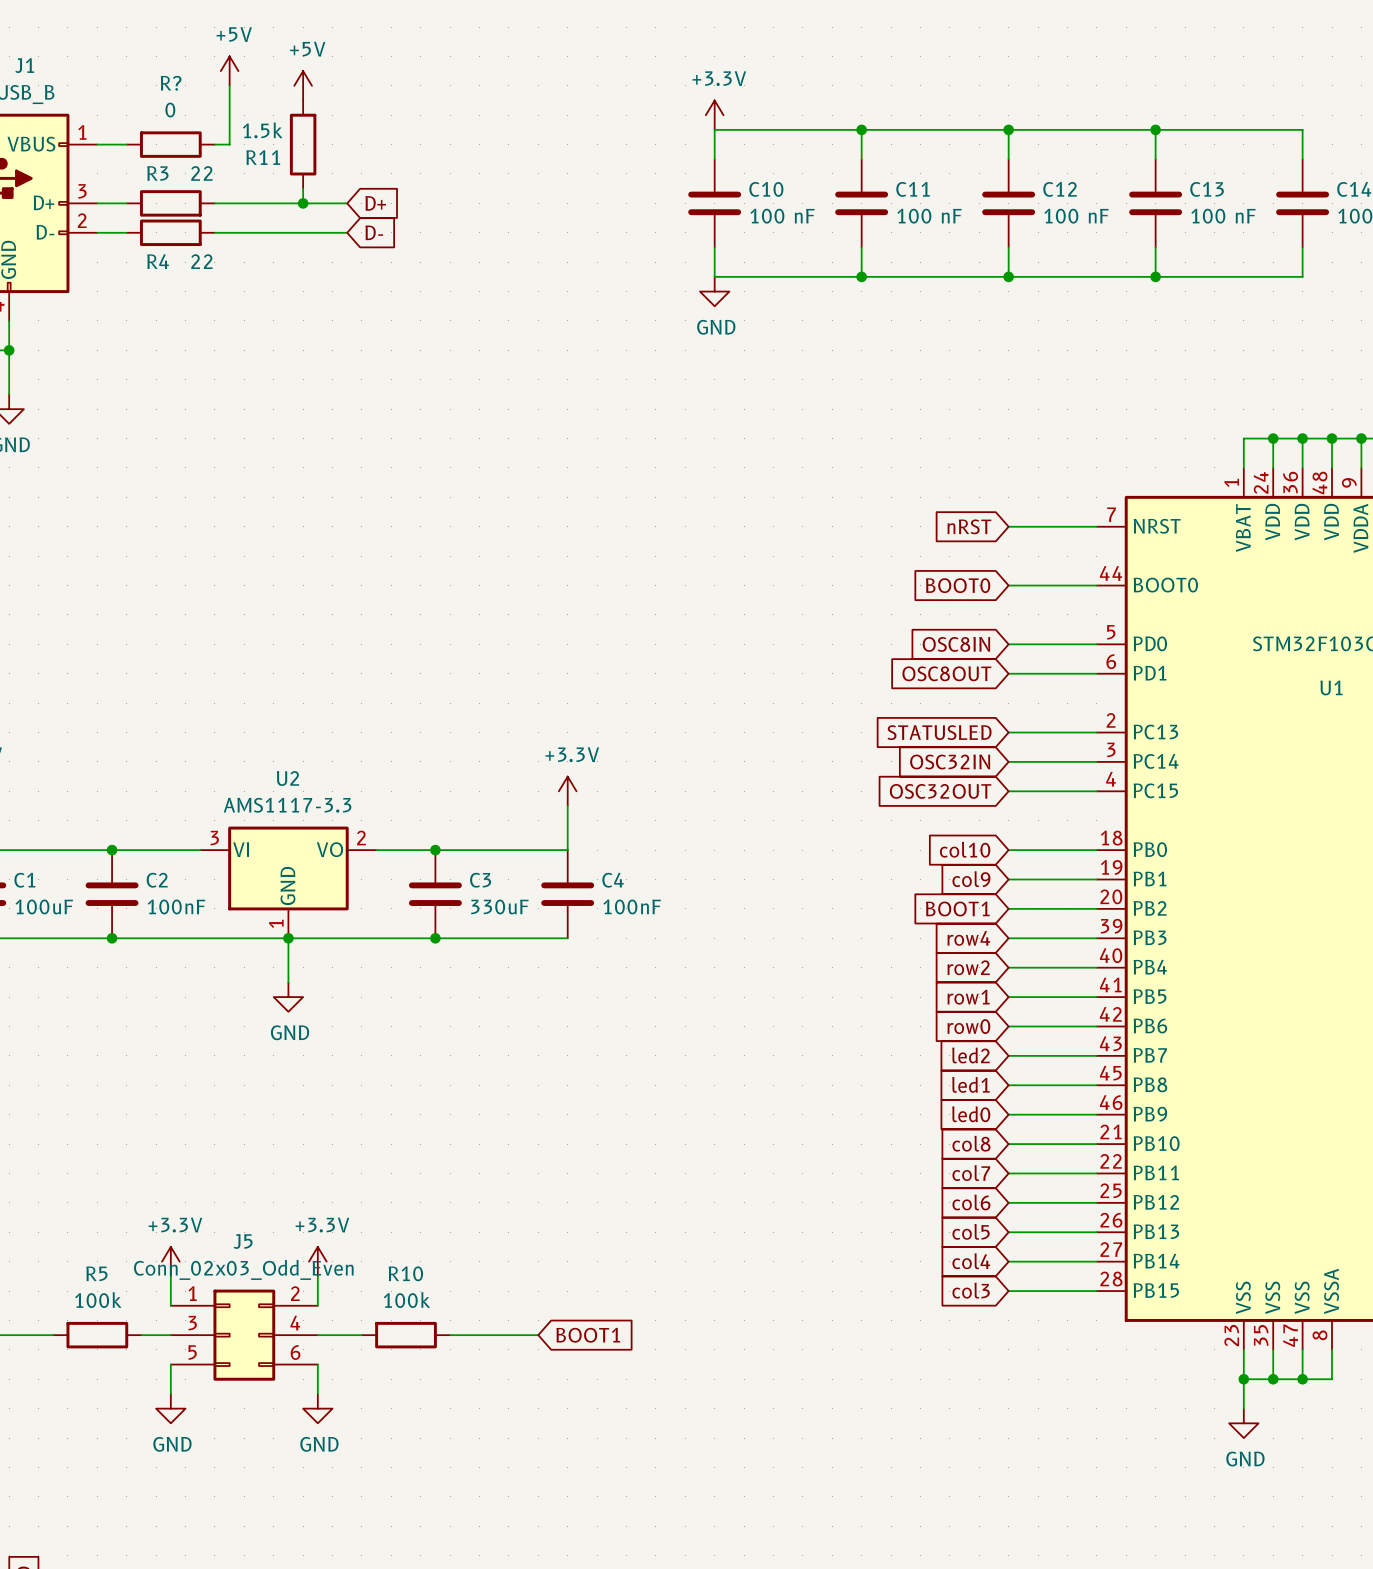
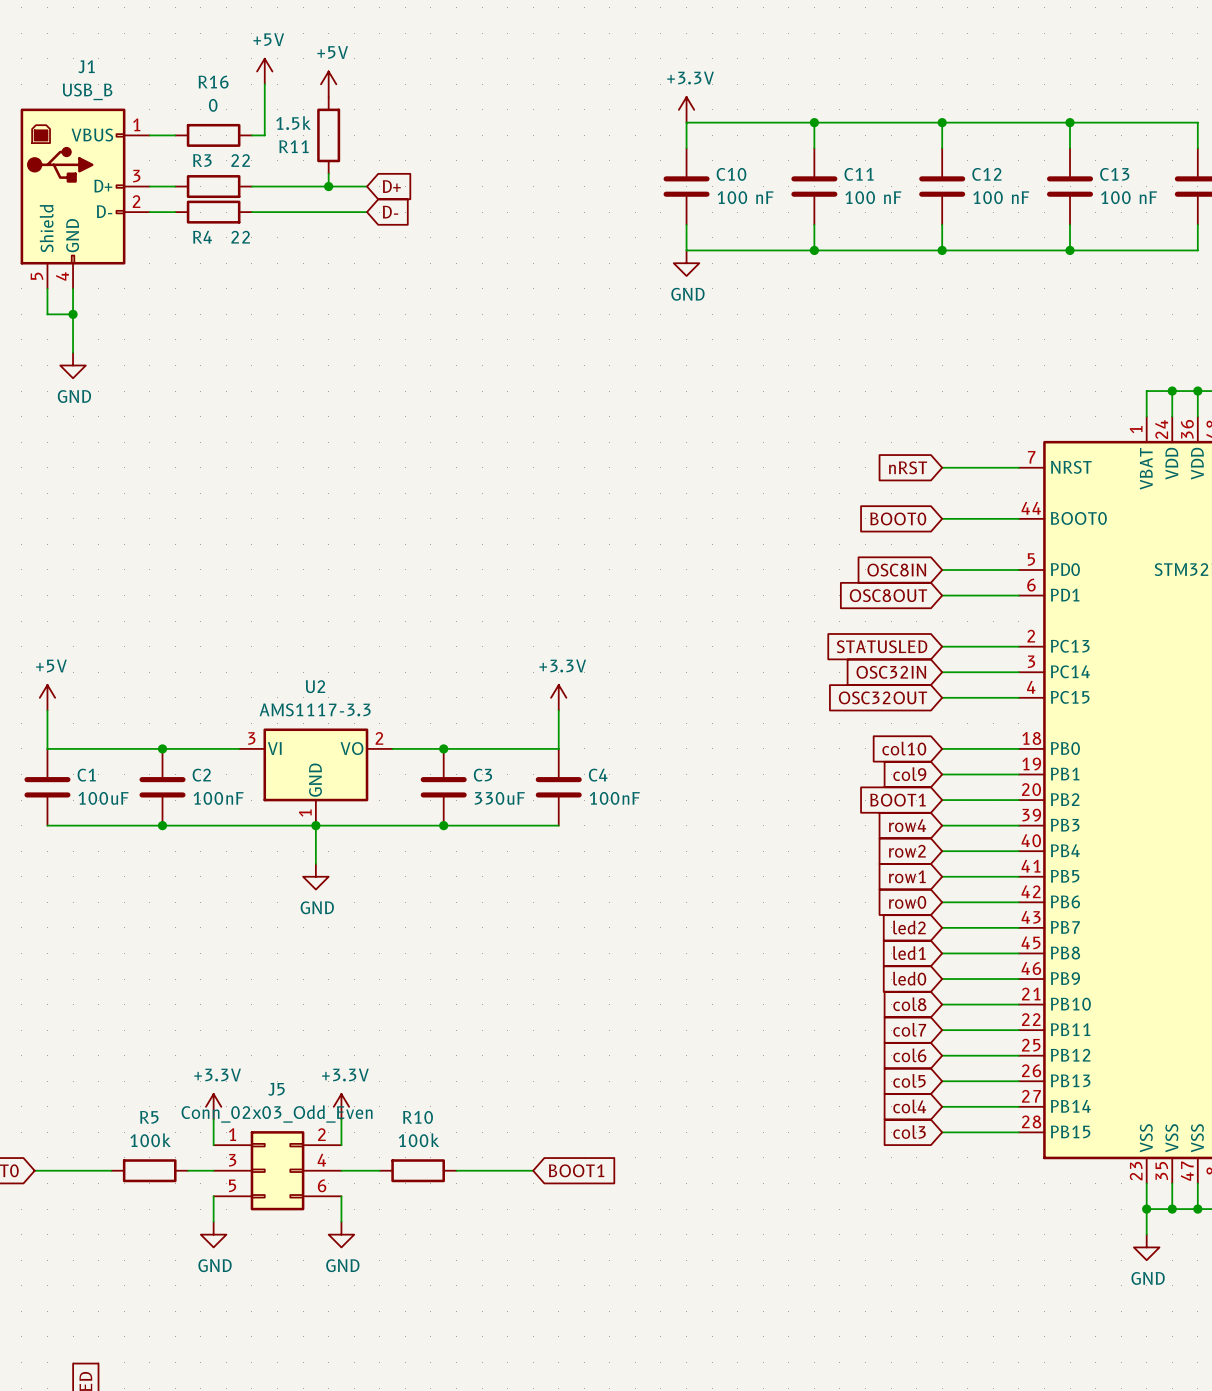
R? name: R? (171, 83) -> R16 (213, 82)

